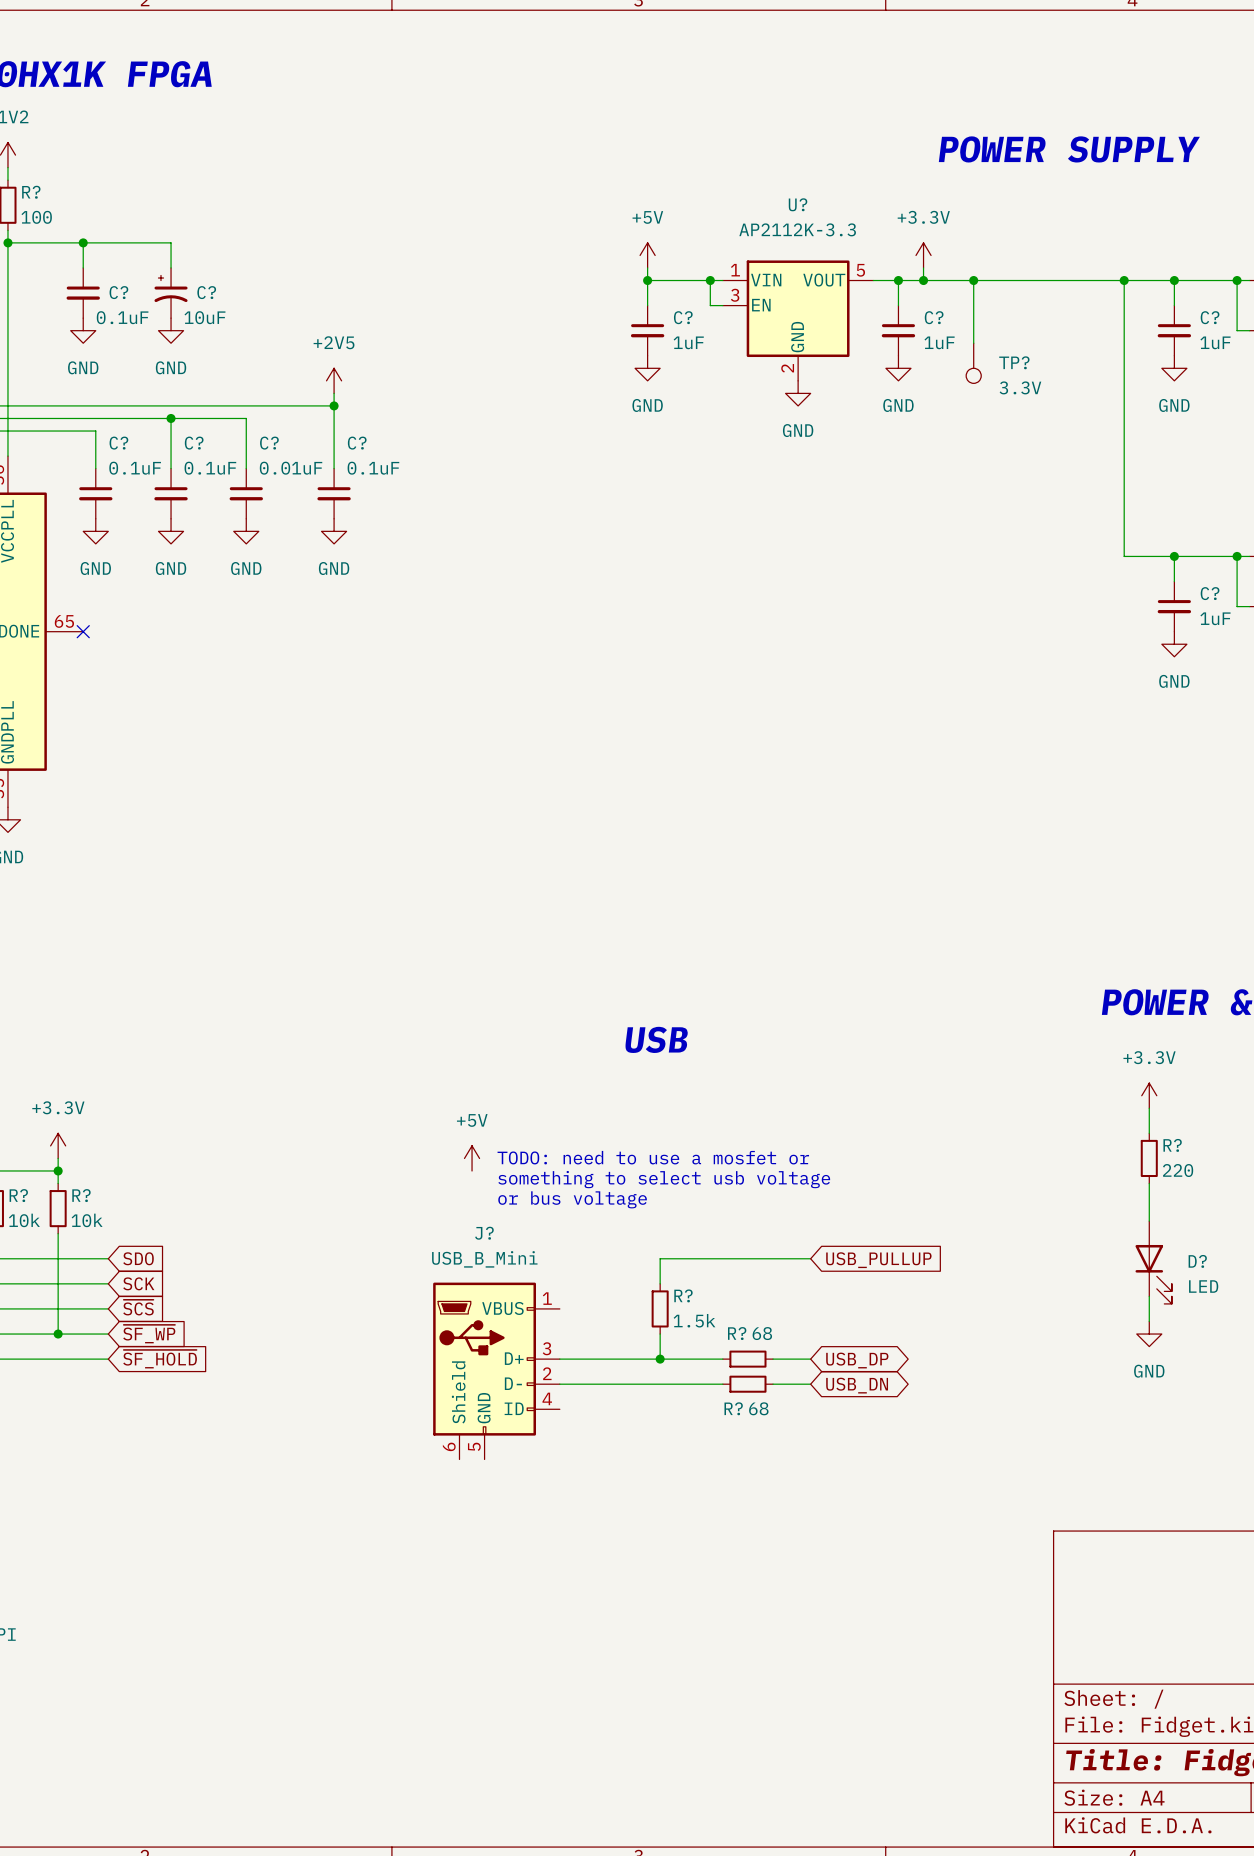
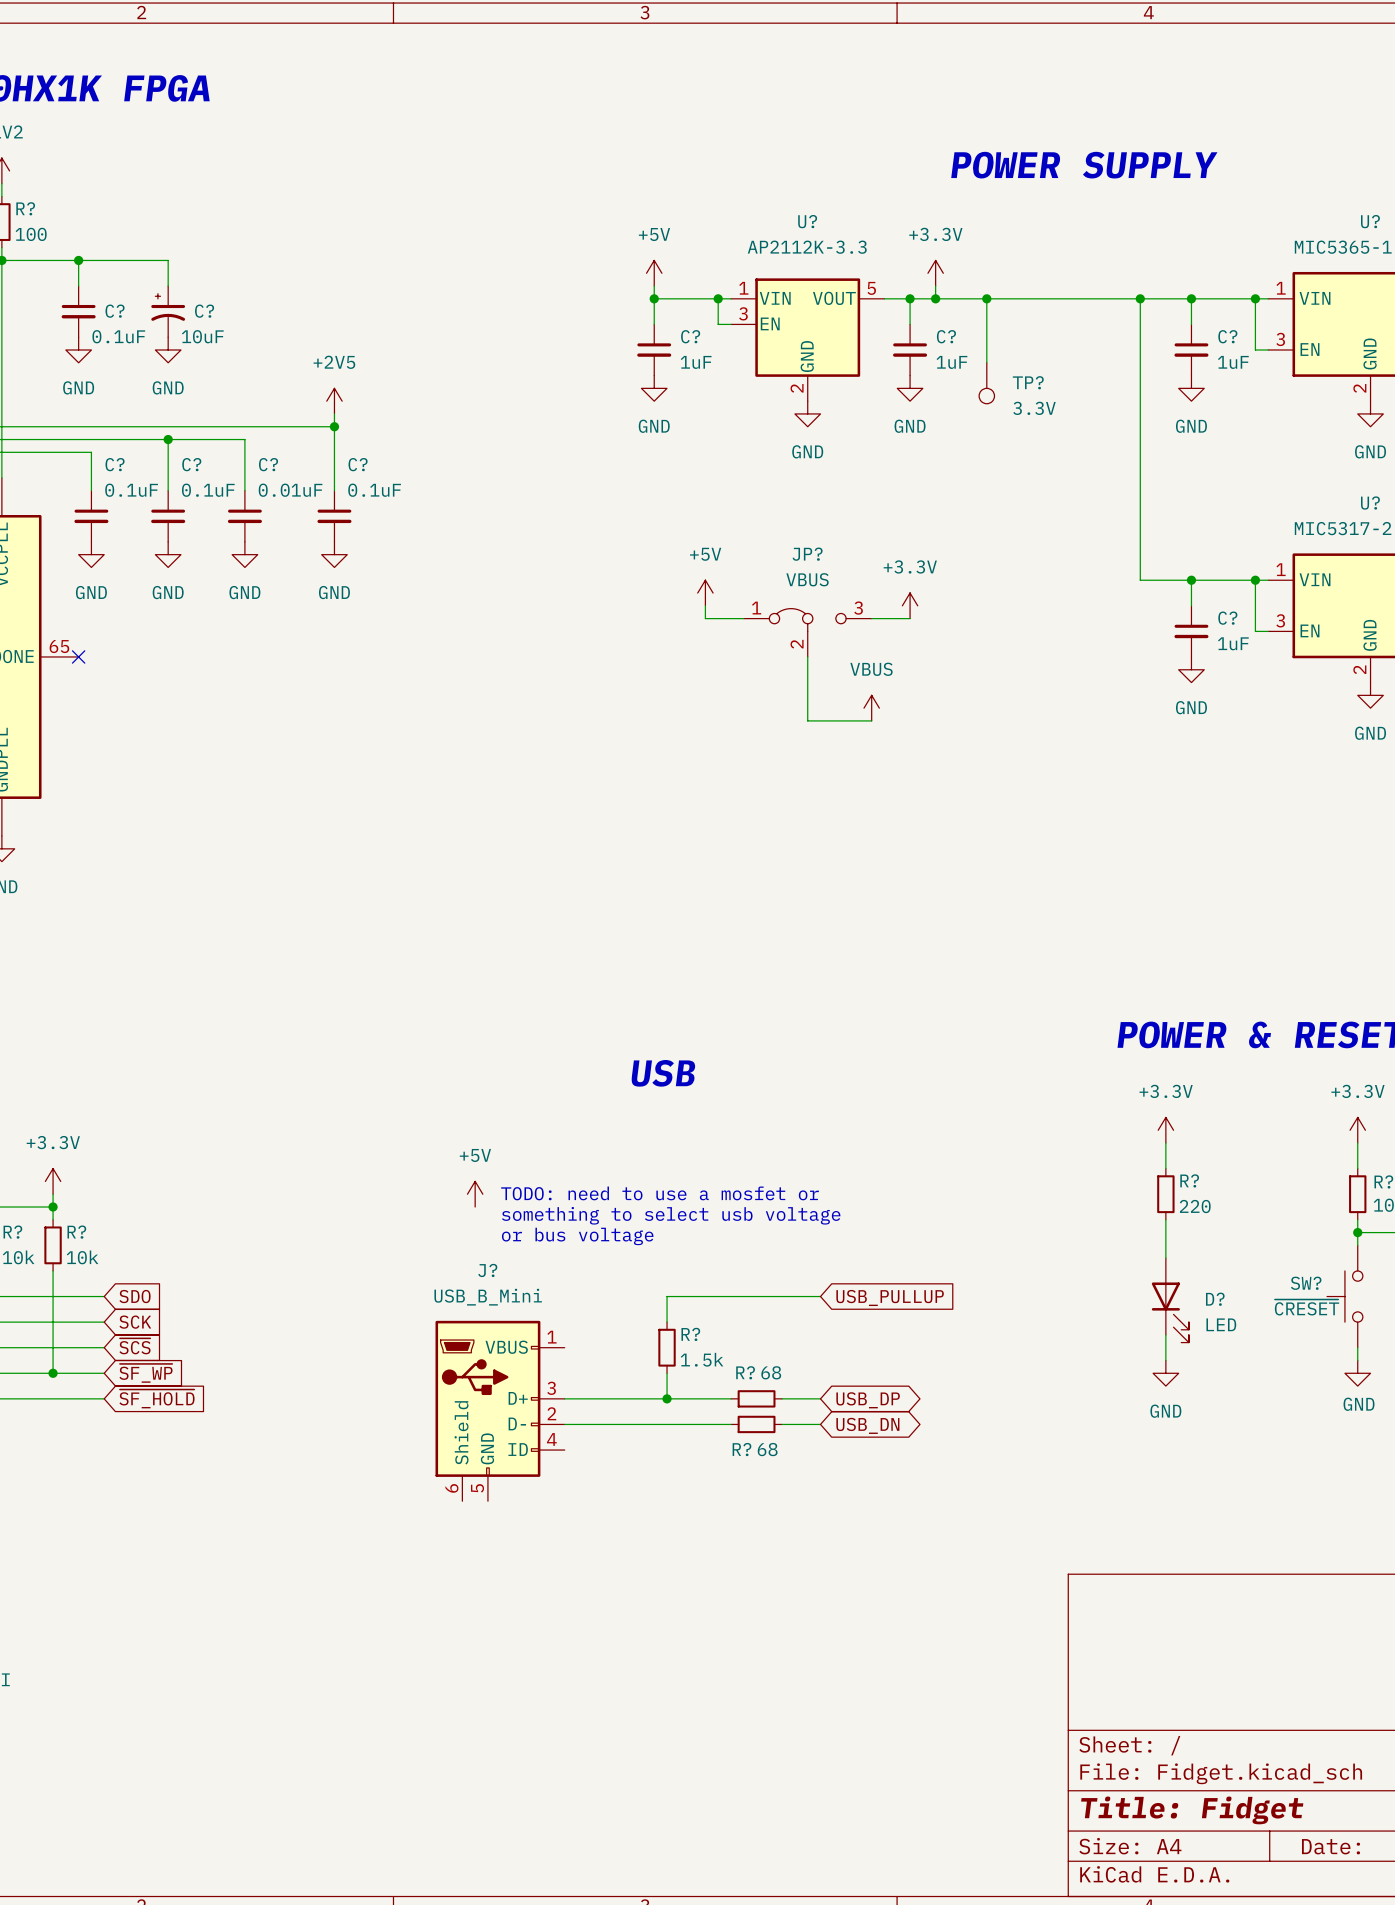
power symbol: none -> +5V (705, 593)
wire: none -> (705, 605) (705, 618) (743, 618)
power symbol: none -> +3.3V (910, 605)
wire: none -> (871, 618) (910, 618)
JP?: none -> VBUS (807, 632)
wire: none -> (807, 656) (807, 720) (871, 720)
power symbol: none -> VBUS (871, 708)

